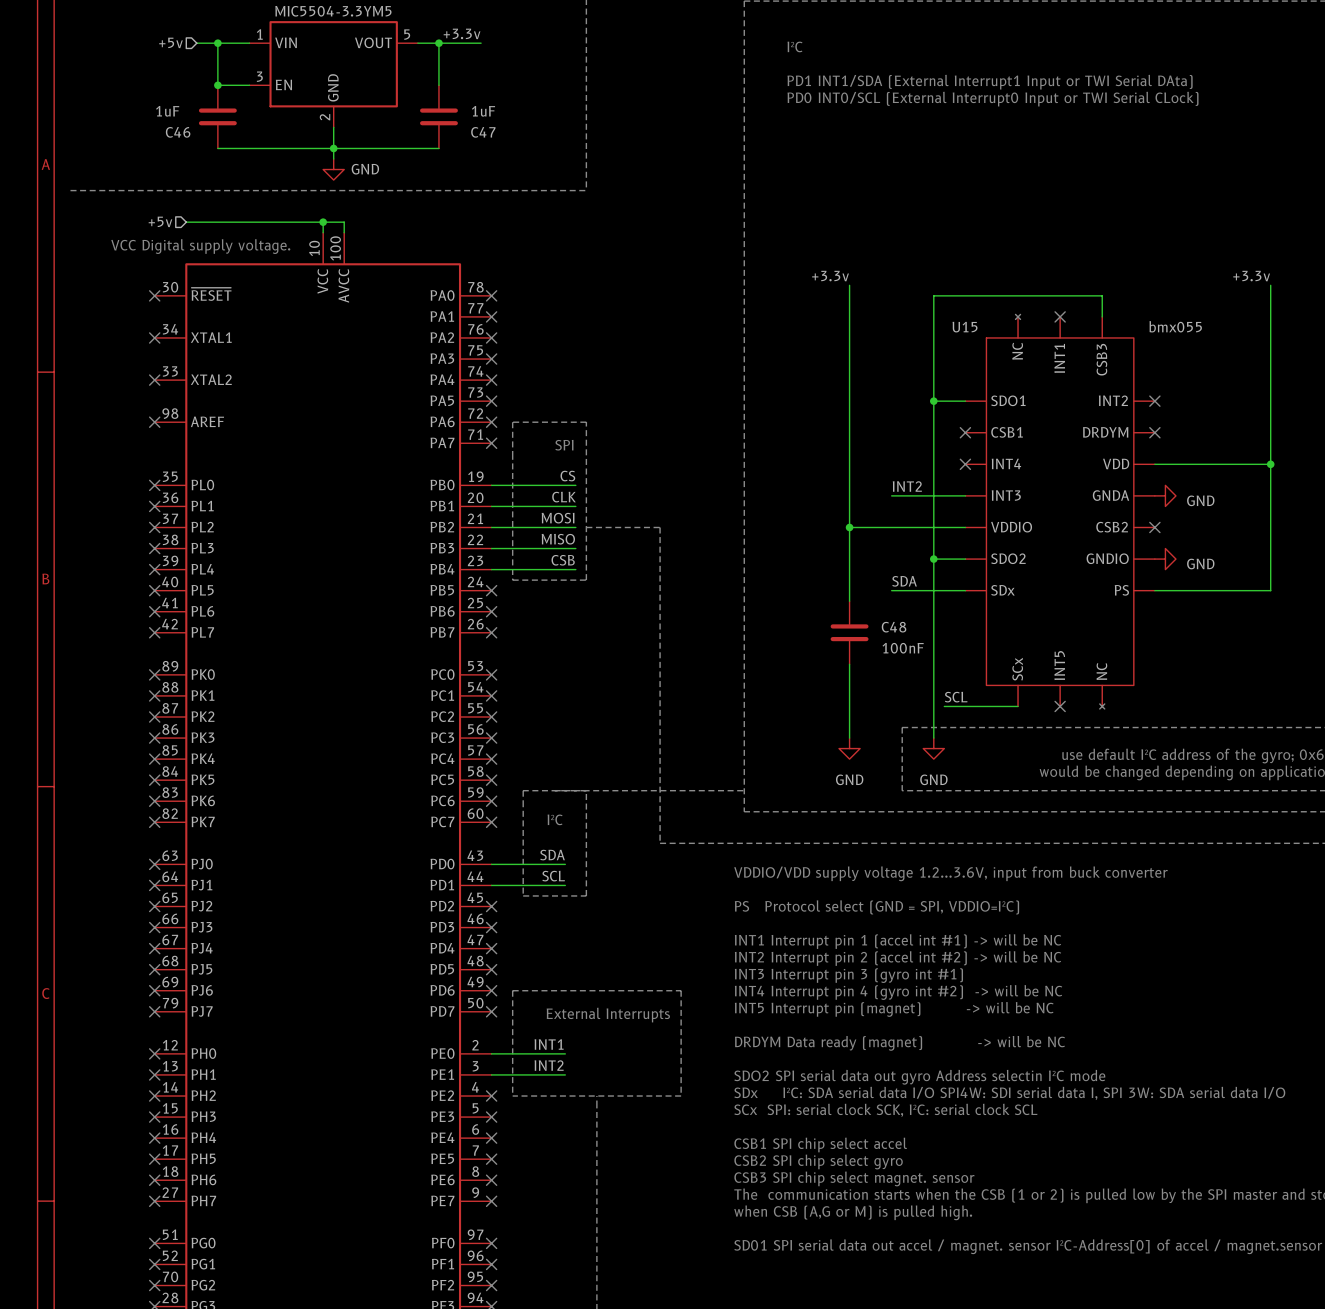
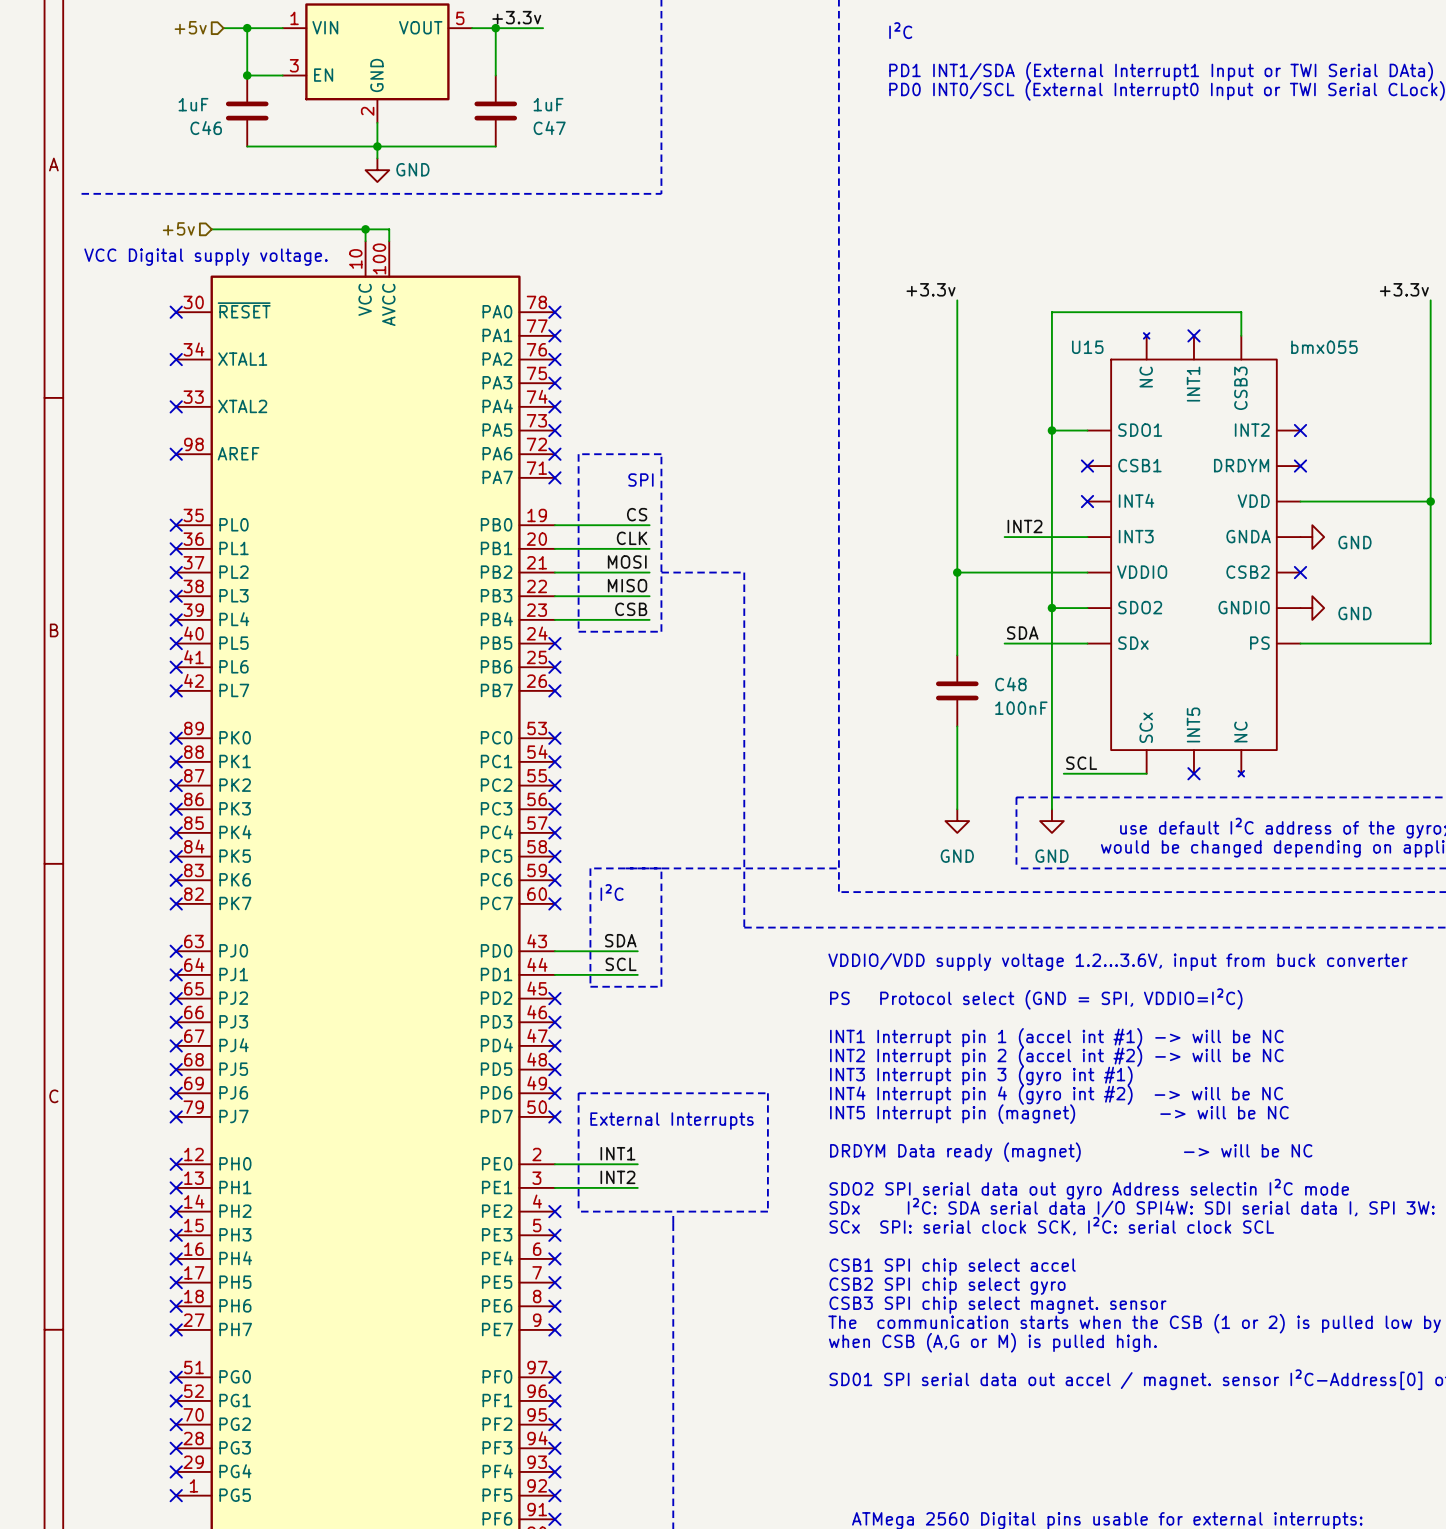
text position: I²C (555, 819) -> I²C (612, 892)

